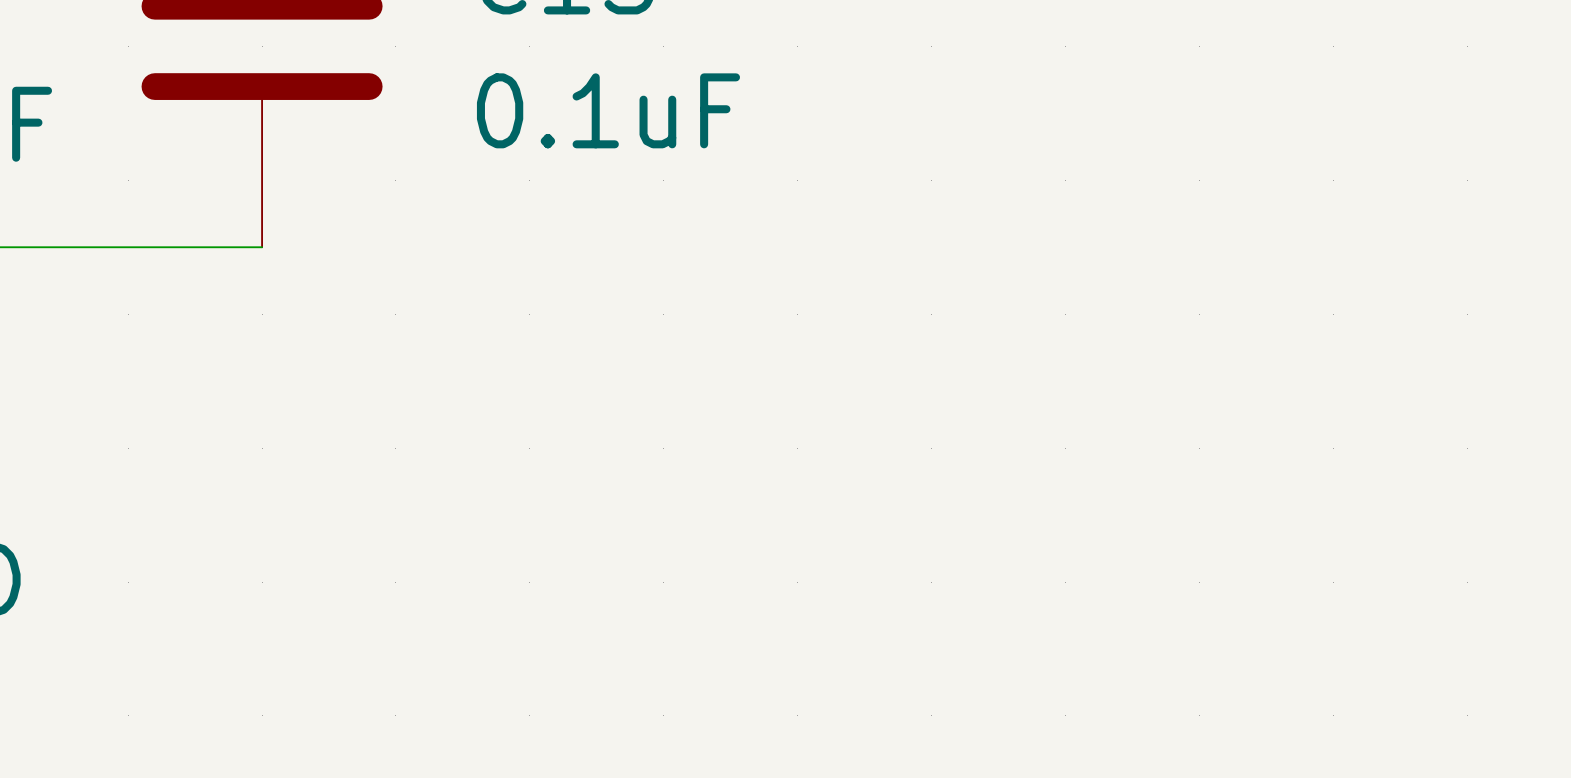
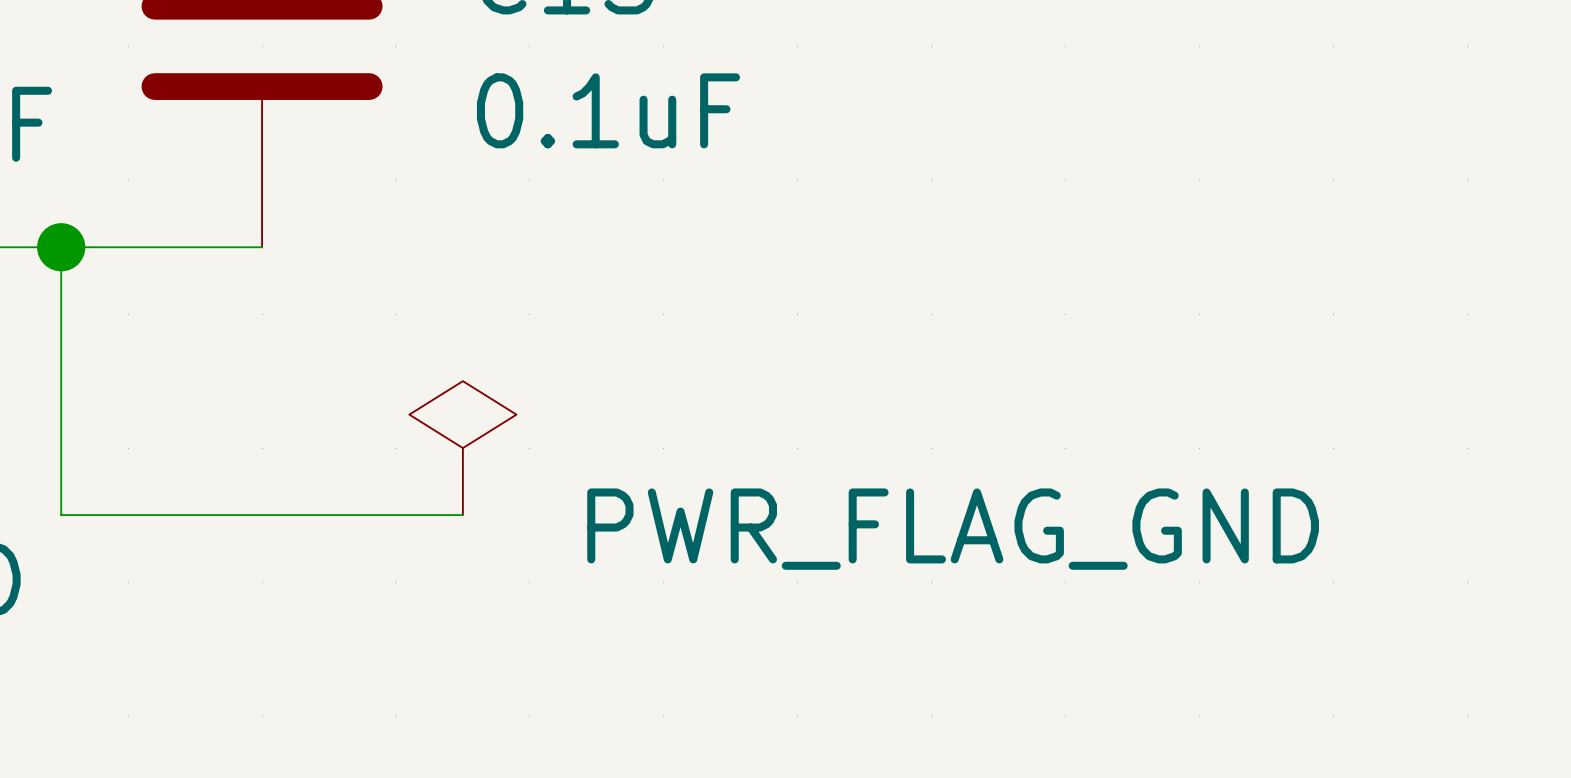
wire: none -> (61, 247) (61, 515) (462, 515)
junction: none -> (61, 247)
power symbol: none -> PWR_FLAG_GND (462, 448)

